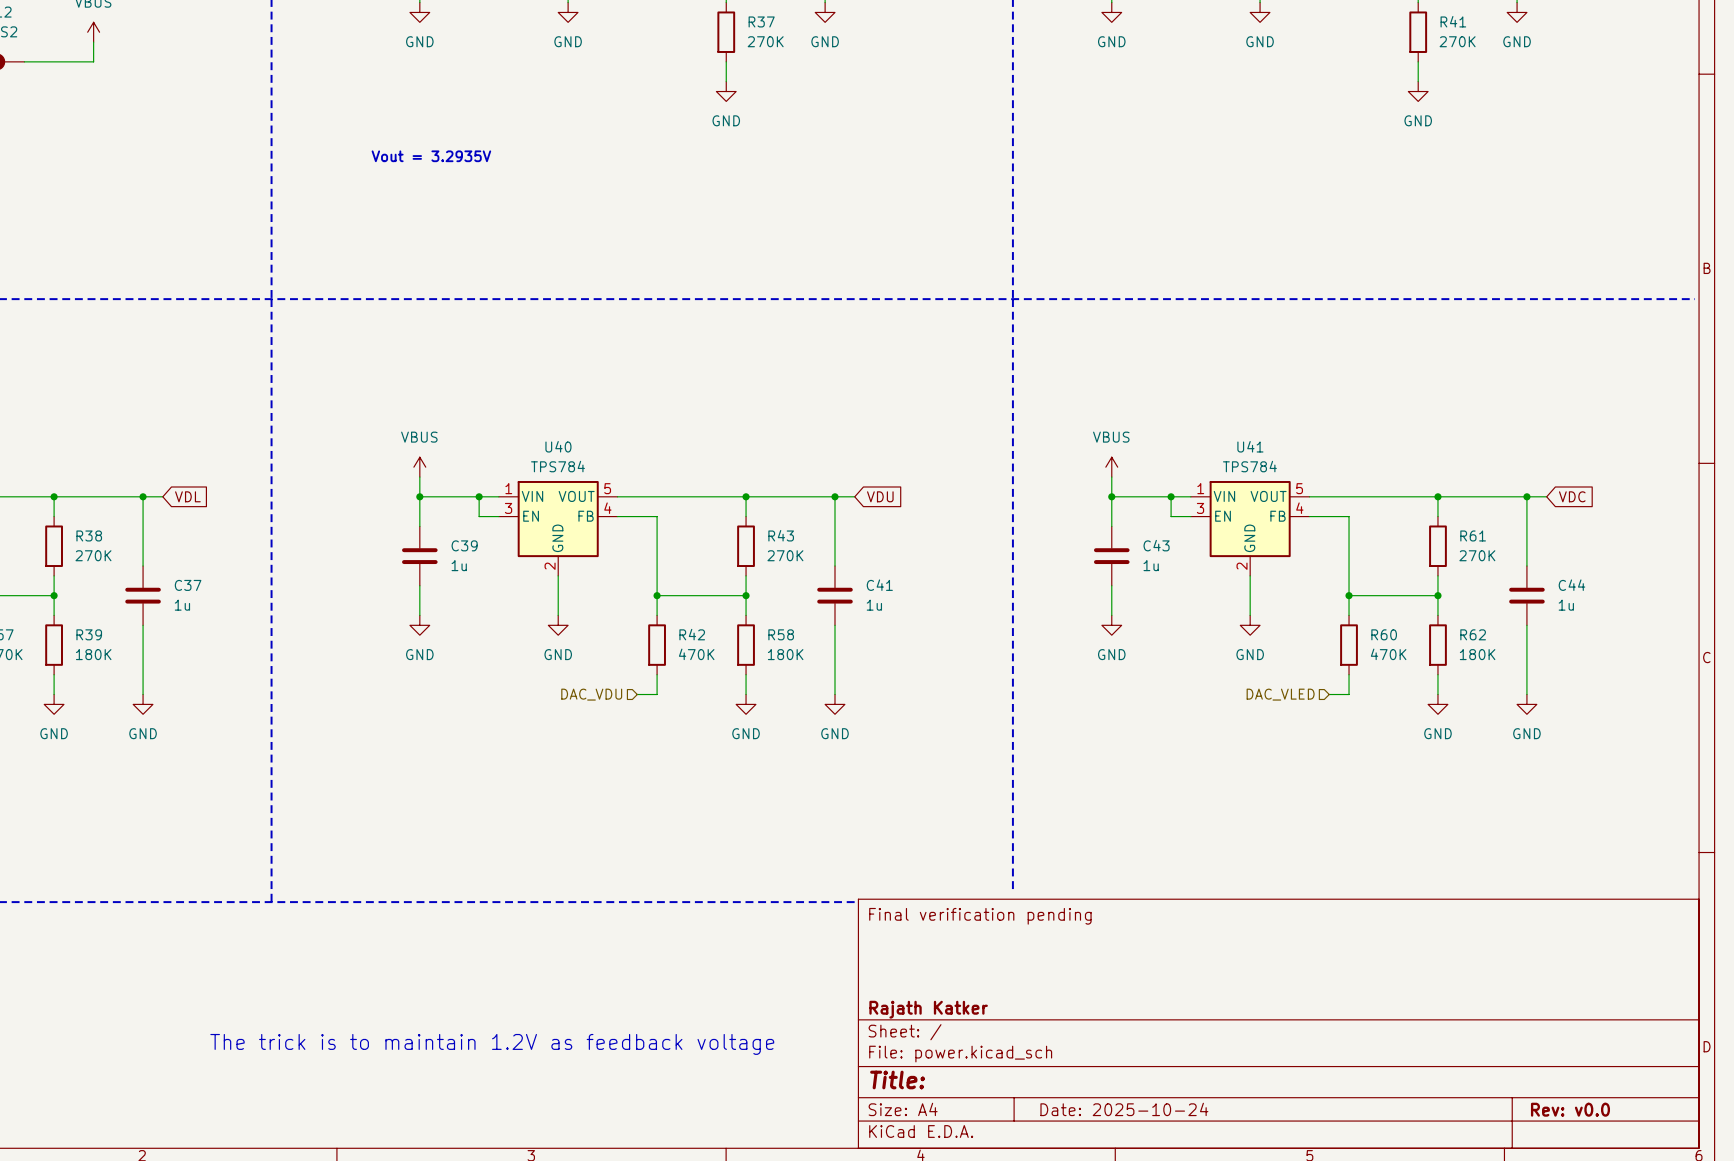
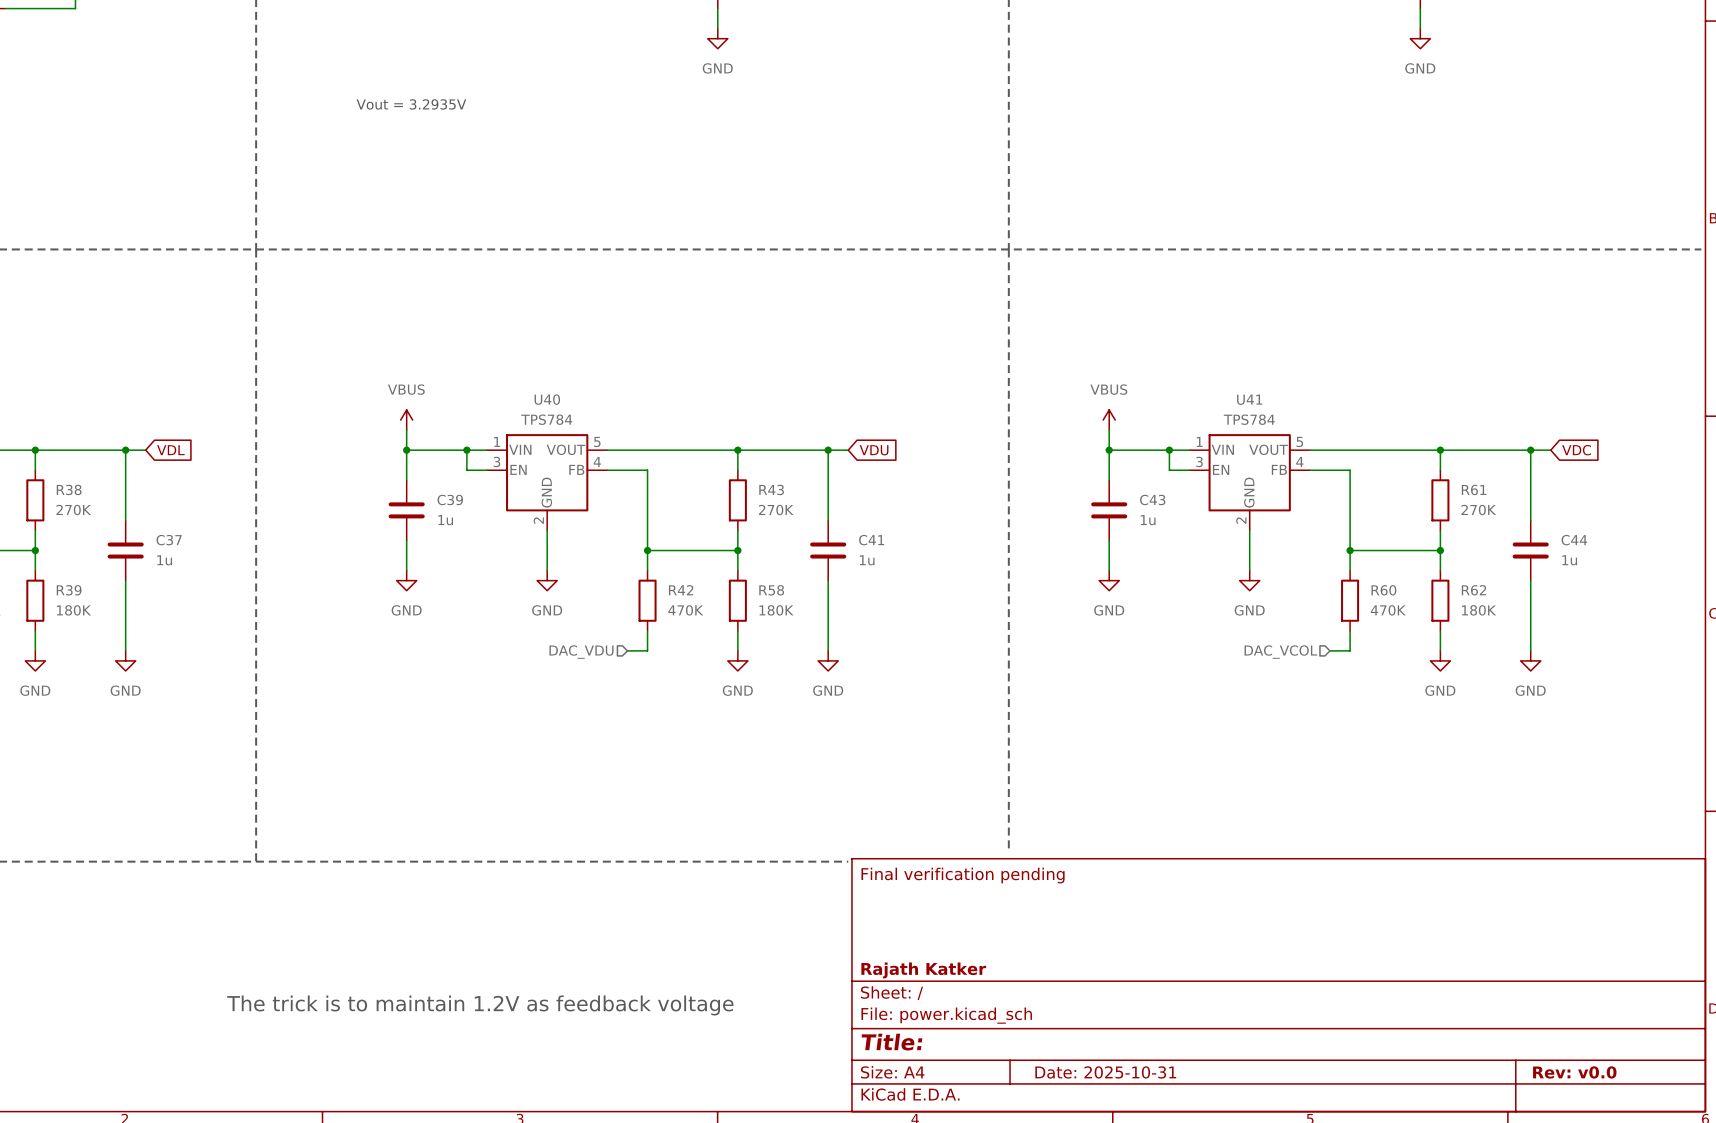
hierarchical label: DAC_VLED (1280, 694) -> DAC_VCOL (1280, 652)
title block: Date: 2025-10-24 (1124, 1109) -> Date: 2025-10-31 (1105, 1072)

